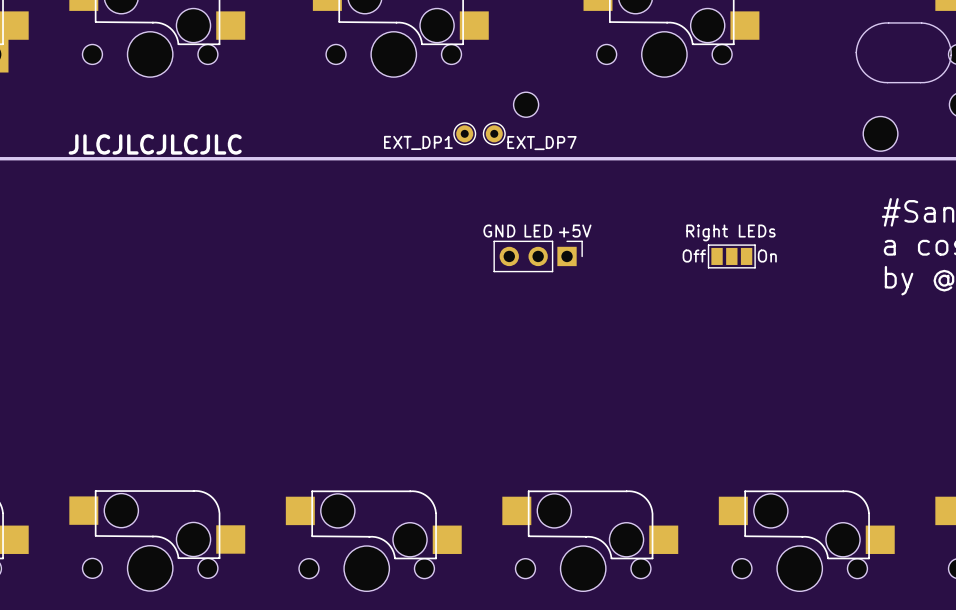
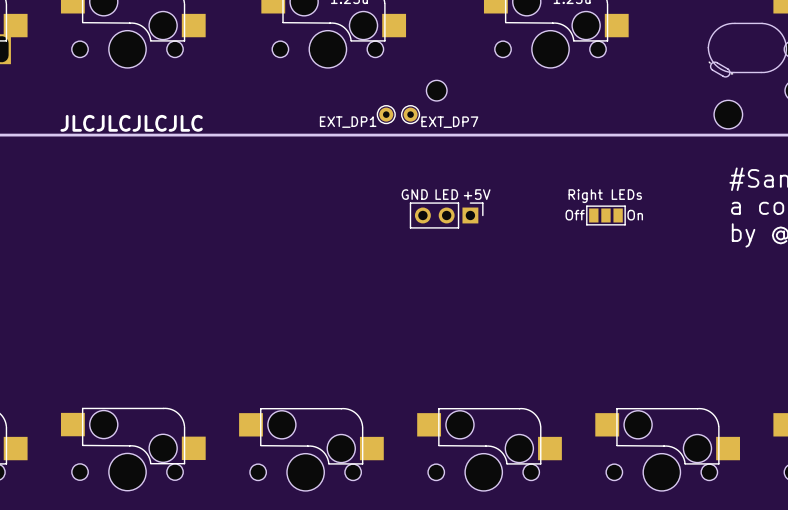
line: none -> (709, 62) (710, 63)
board edge: none -> (717, 62) (728, 69) (728, 75) (724, 76) (711, 69) (711, 63) (717, 62)
line: none -> (732, 73) (731, 73)

